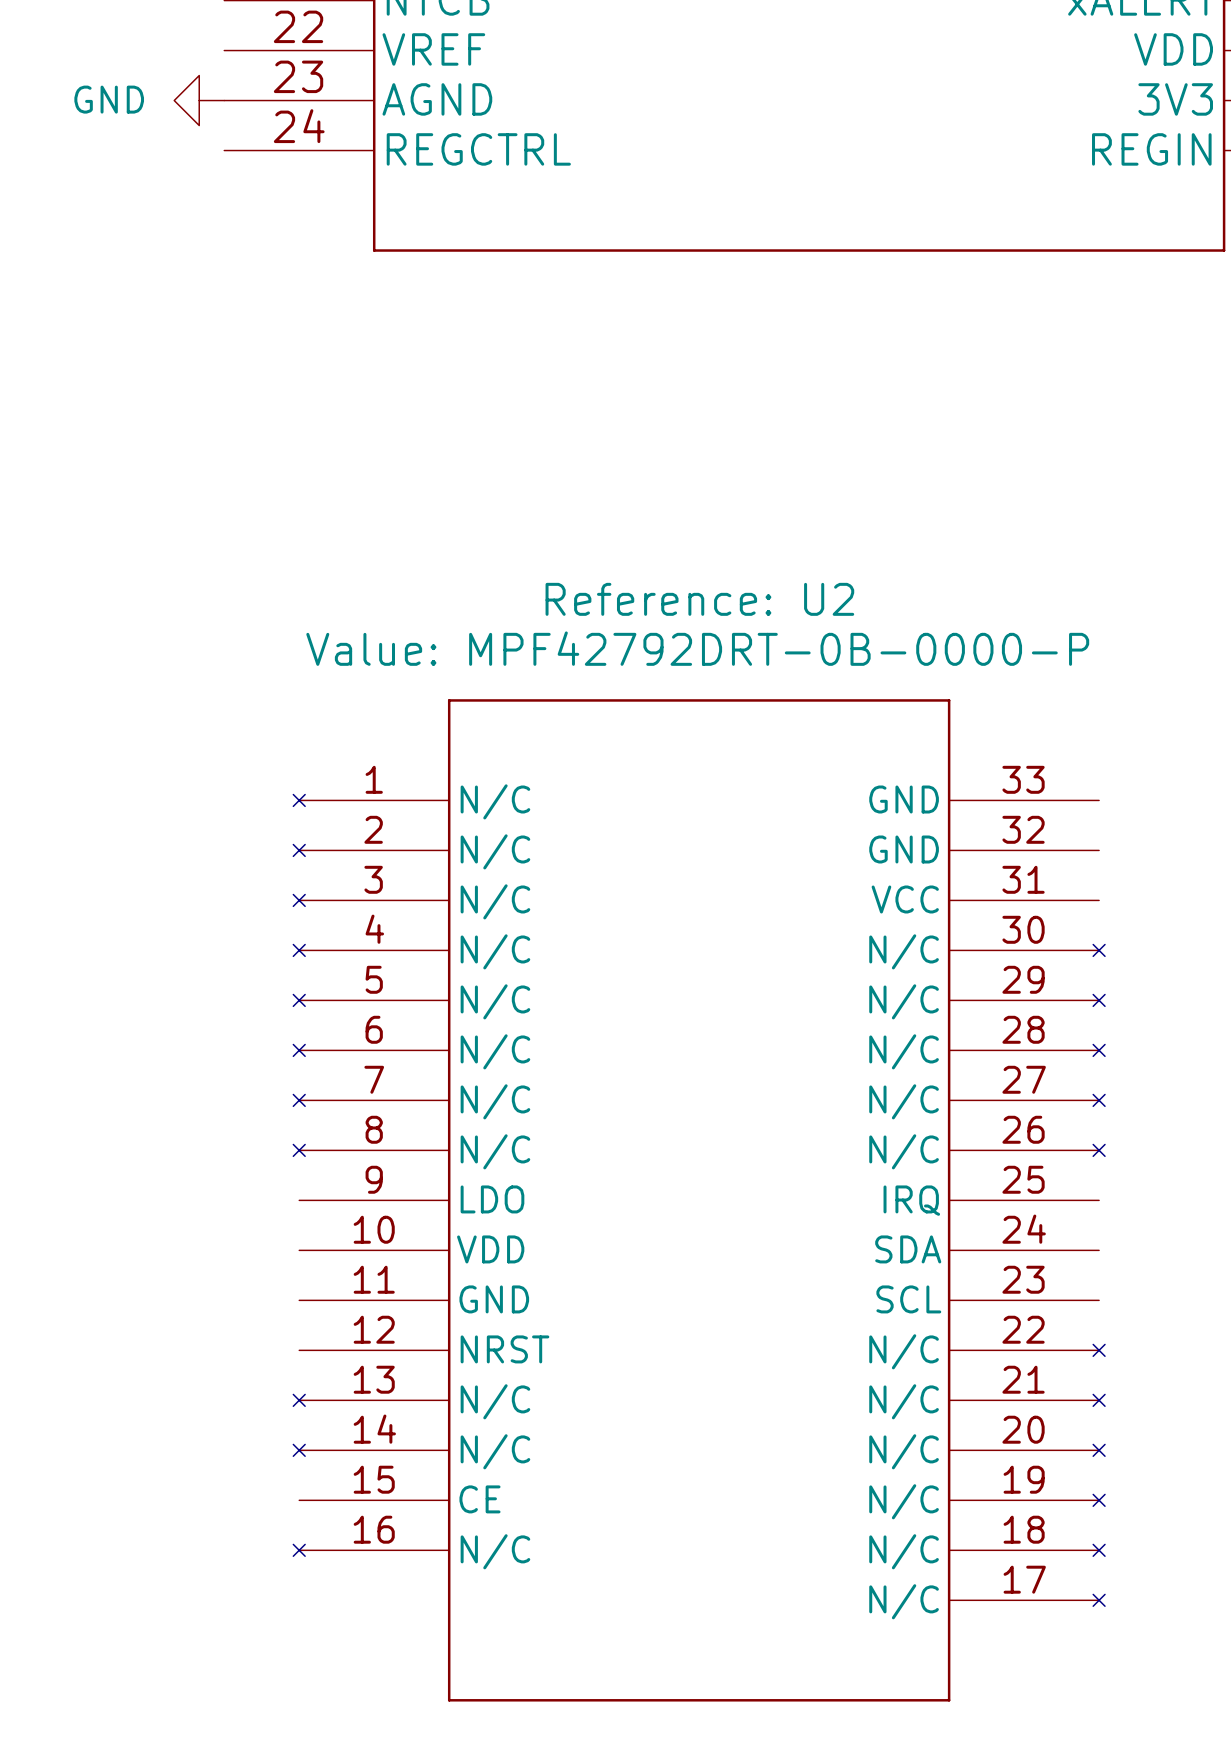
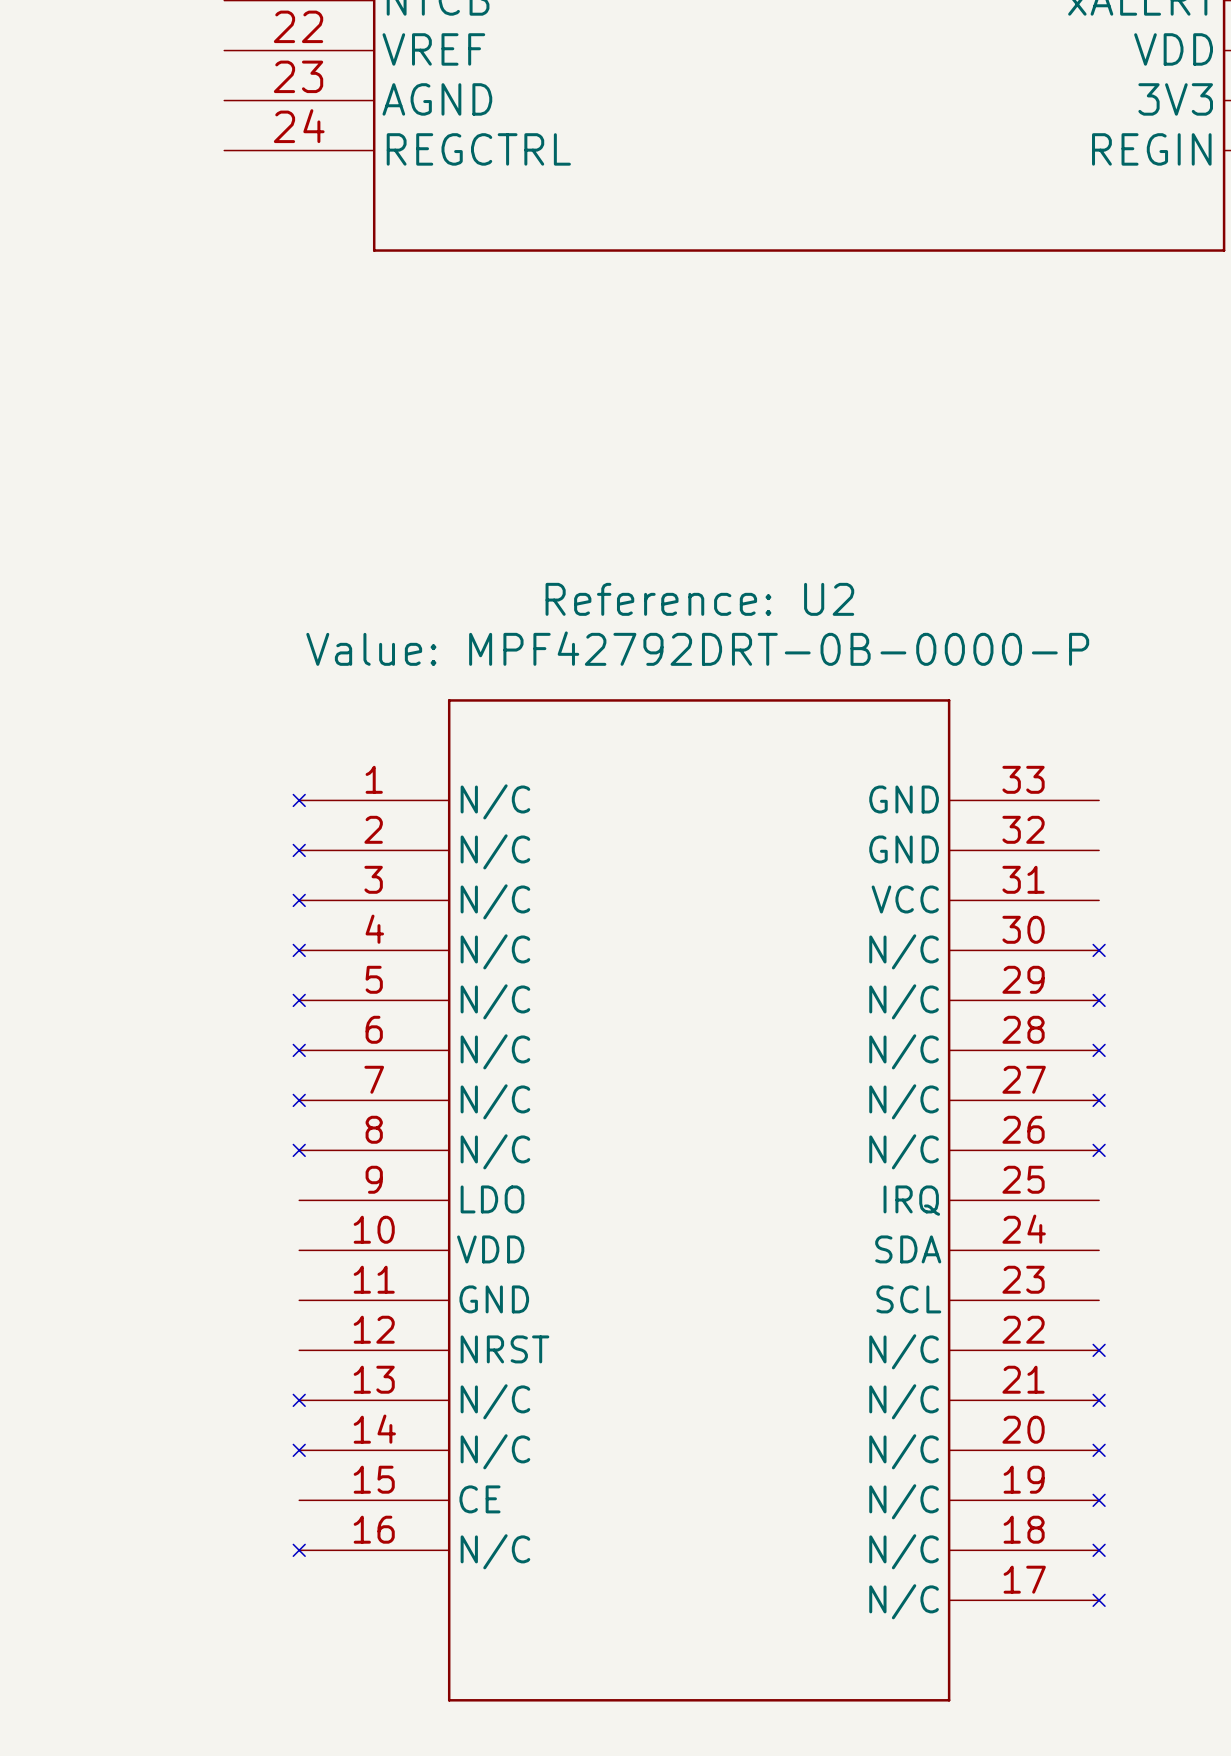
power symbol: GND (199, 100) -> none

